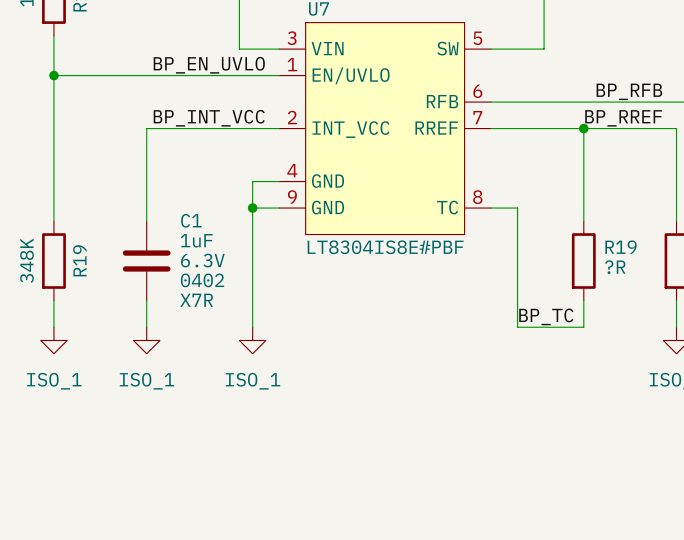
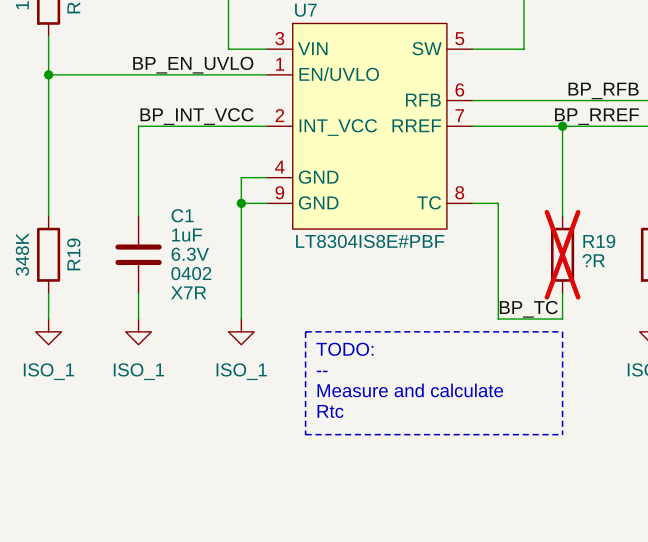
R19 do-not-place cross: none -> (562, 254)
line: none -> (305, 331) (562, 331) (562, 434) (305, 434) (305, 331)
text: none -> TODO: (344, 349)
text: none -> -- (322, 371)
text: none -> Measure and calculate (410, 390)
text: none -> Rtc (330, 411)

